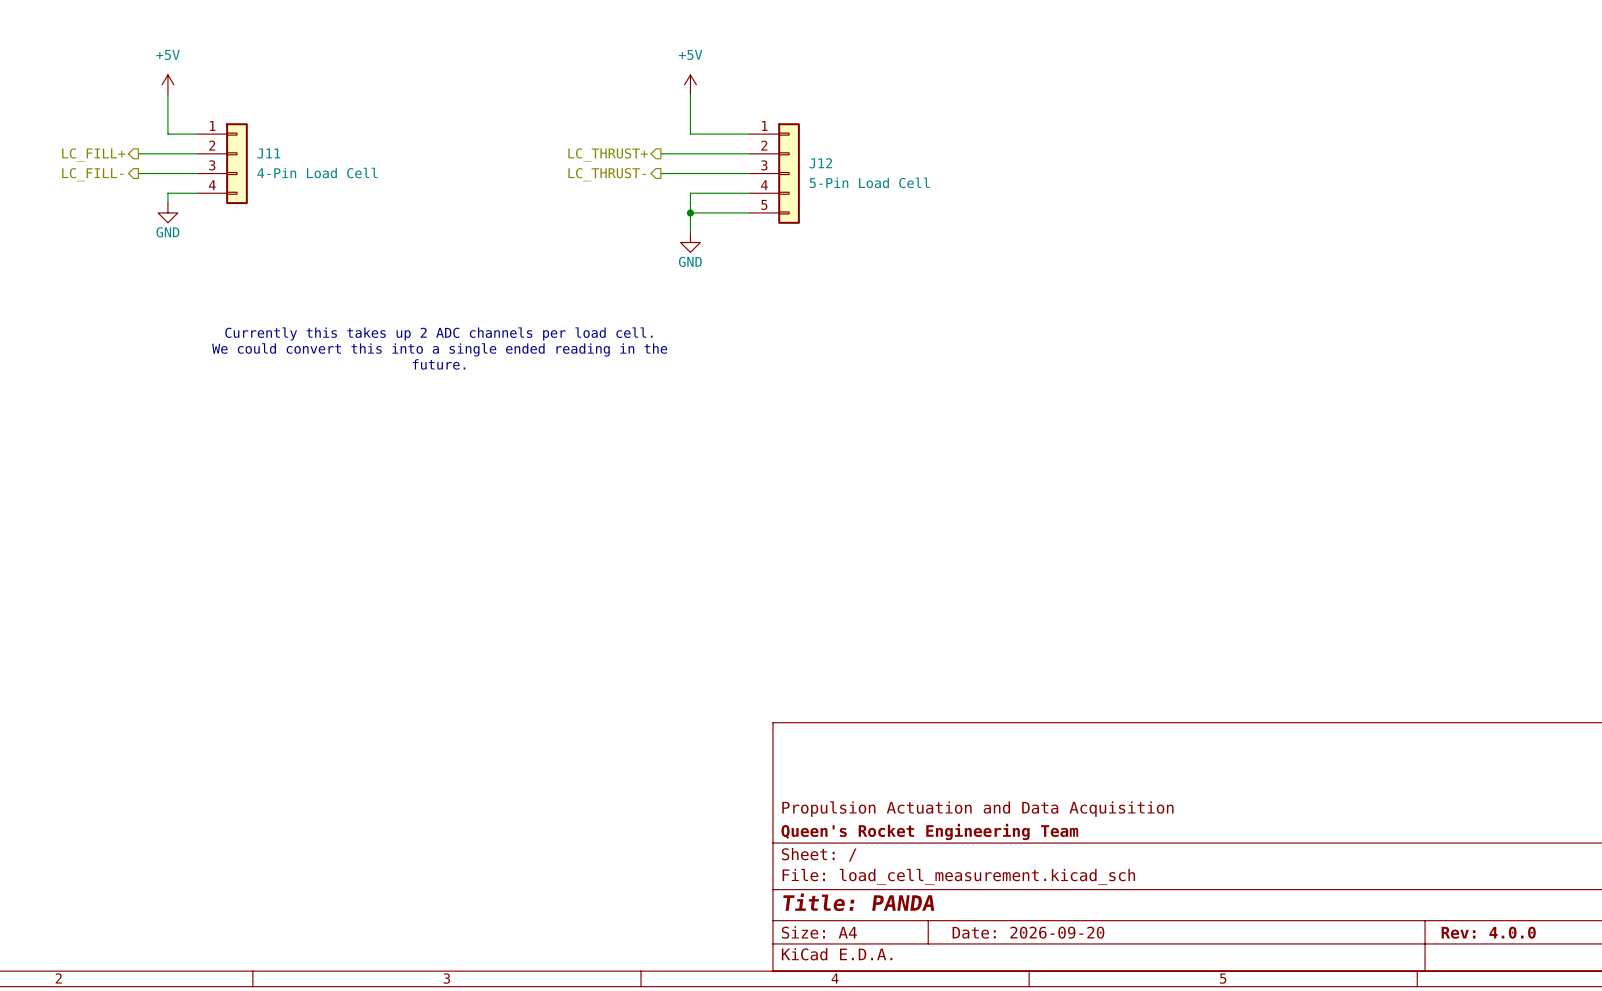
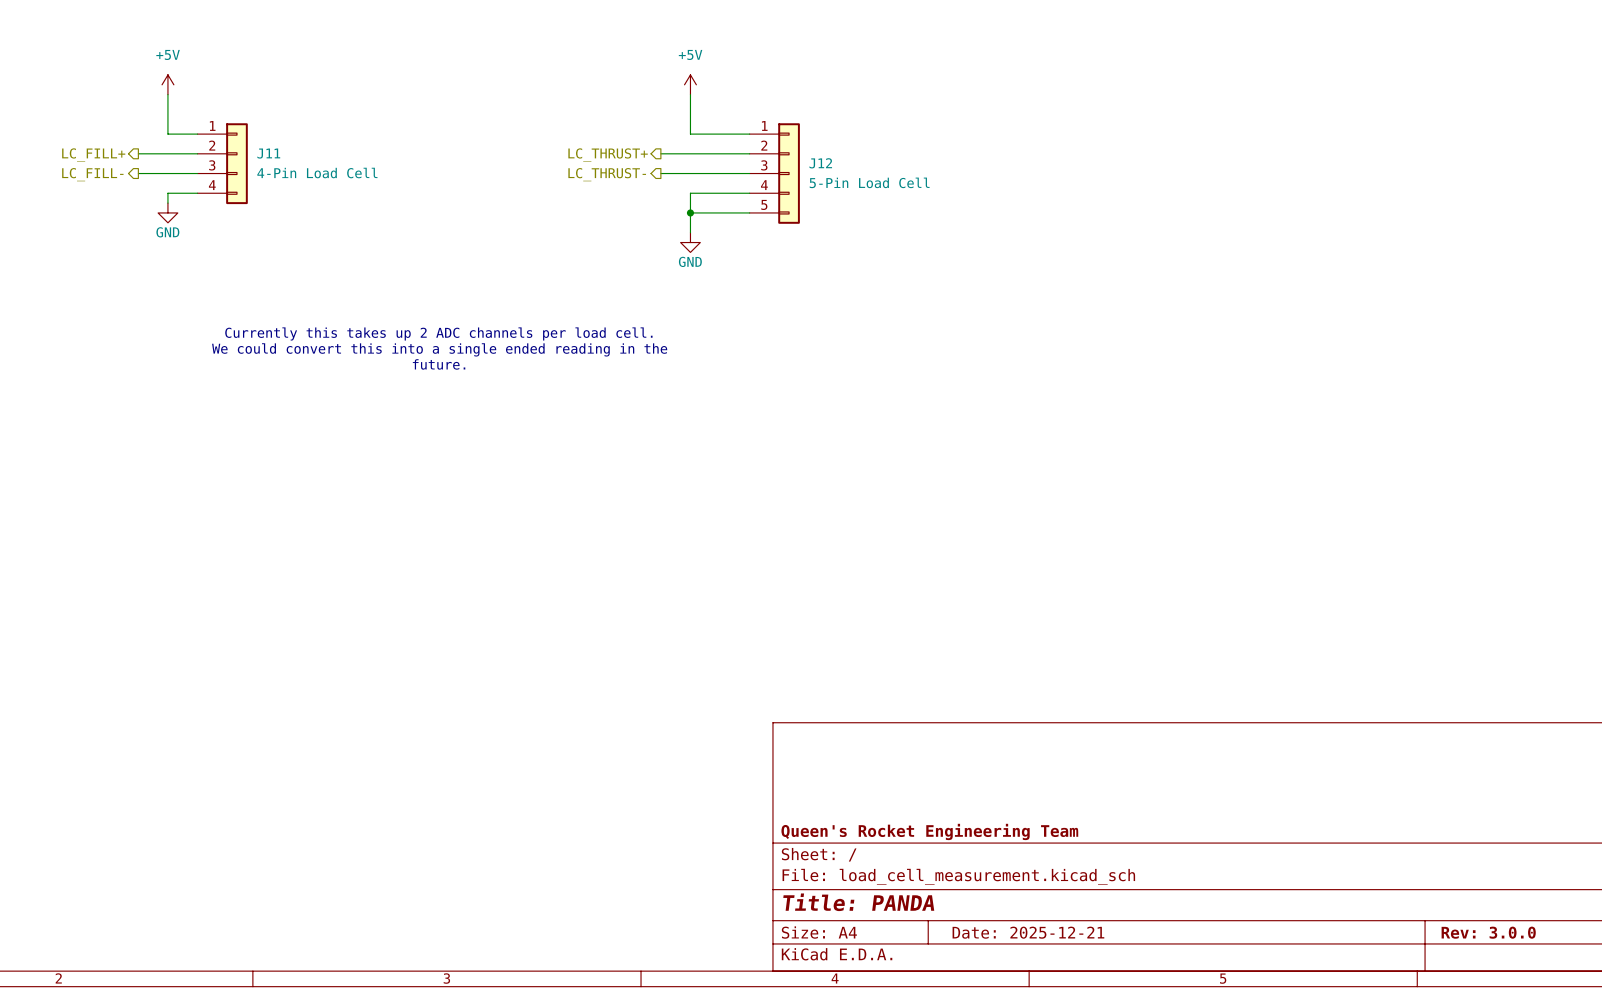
title block: Propulsion Actuation and Data Acquisition (977, 809) -> none
title block: Date: 2026-09-20 (1028, 932) -> Date: 2025-12-21 (1028, 932)
title block: Rev: 4.0.0 (1488, 932) -> Rev: 3.0.0 (1488, 932)

